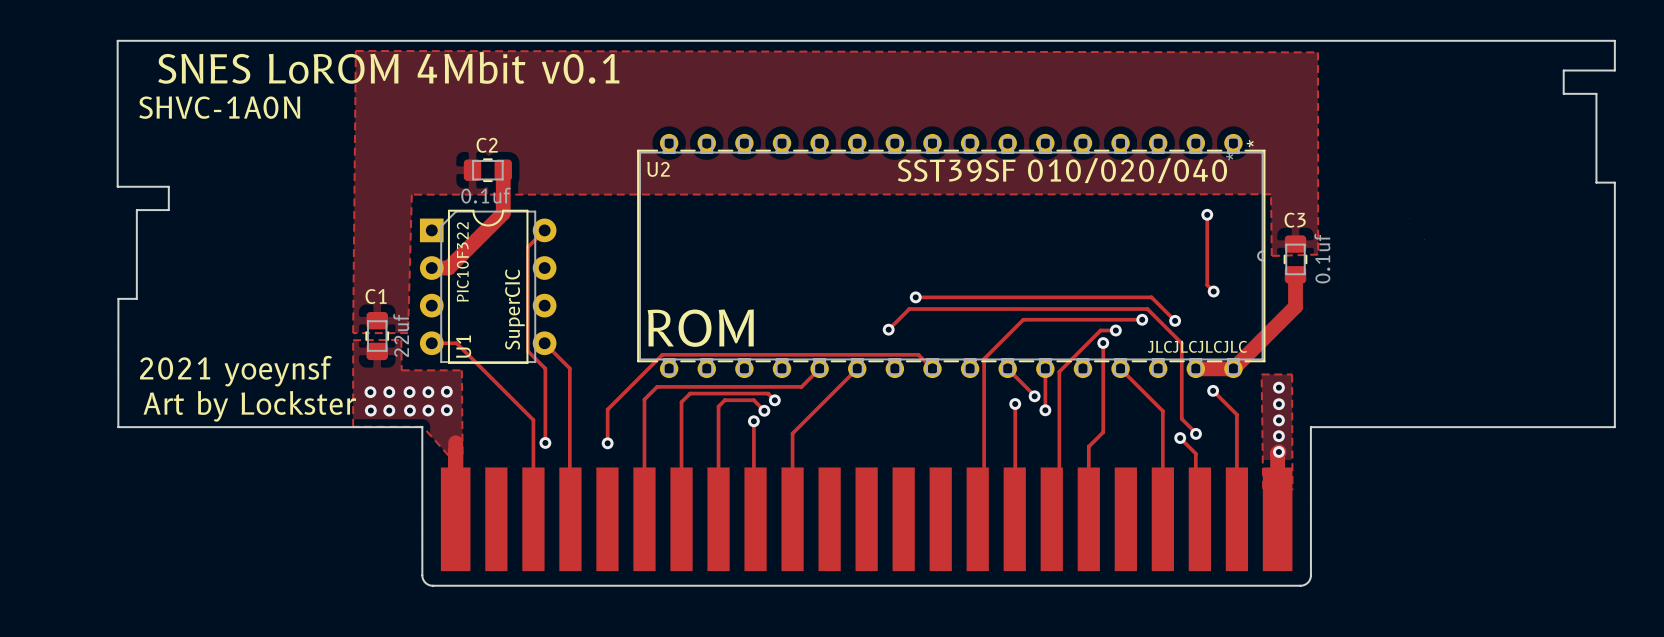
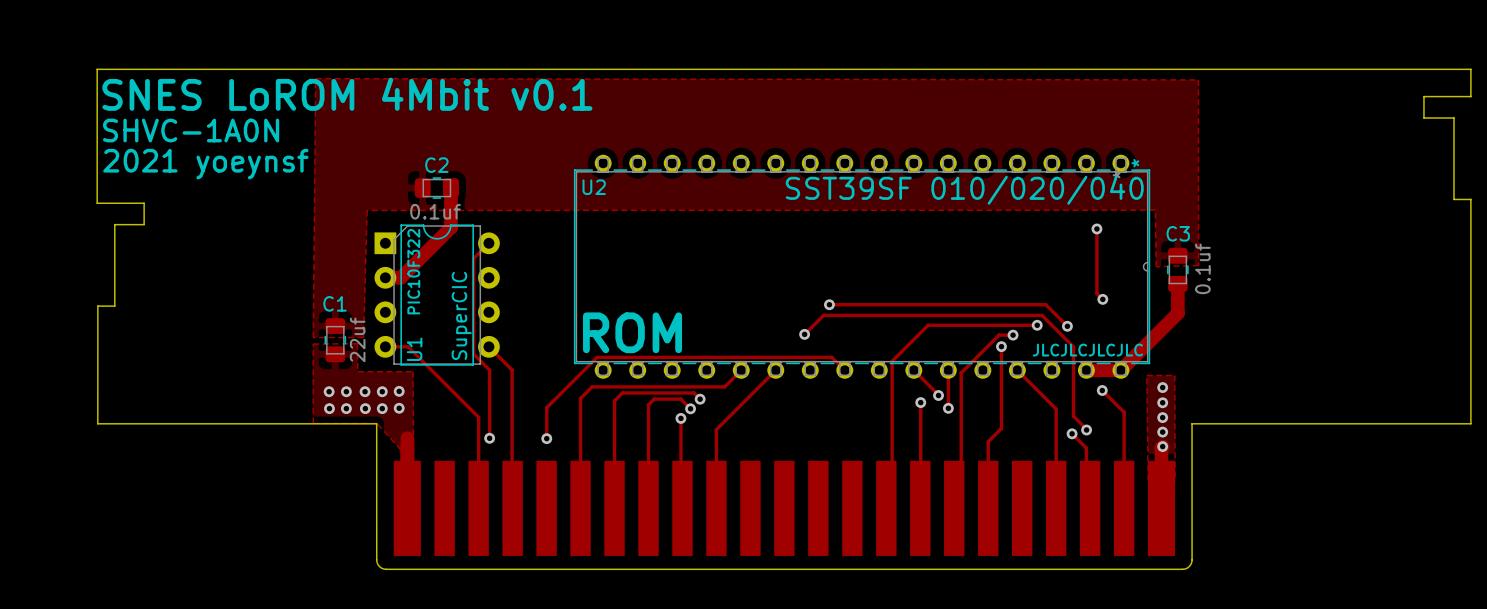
text position: 2021 yoeynsf (236, 371) -> 2021 yoeynsf (205, 164)
text: Art by Lockster (249, 406) -> none

